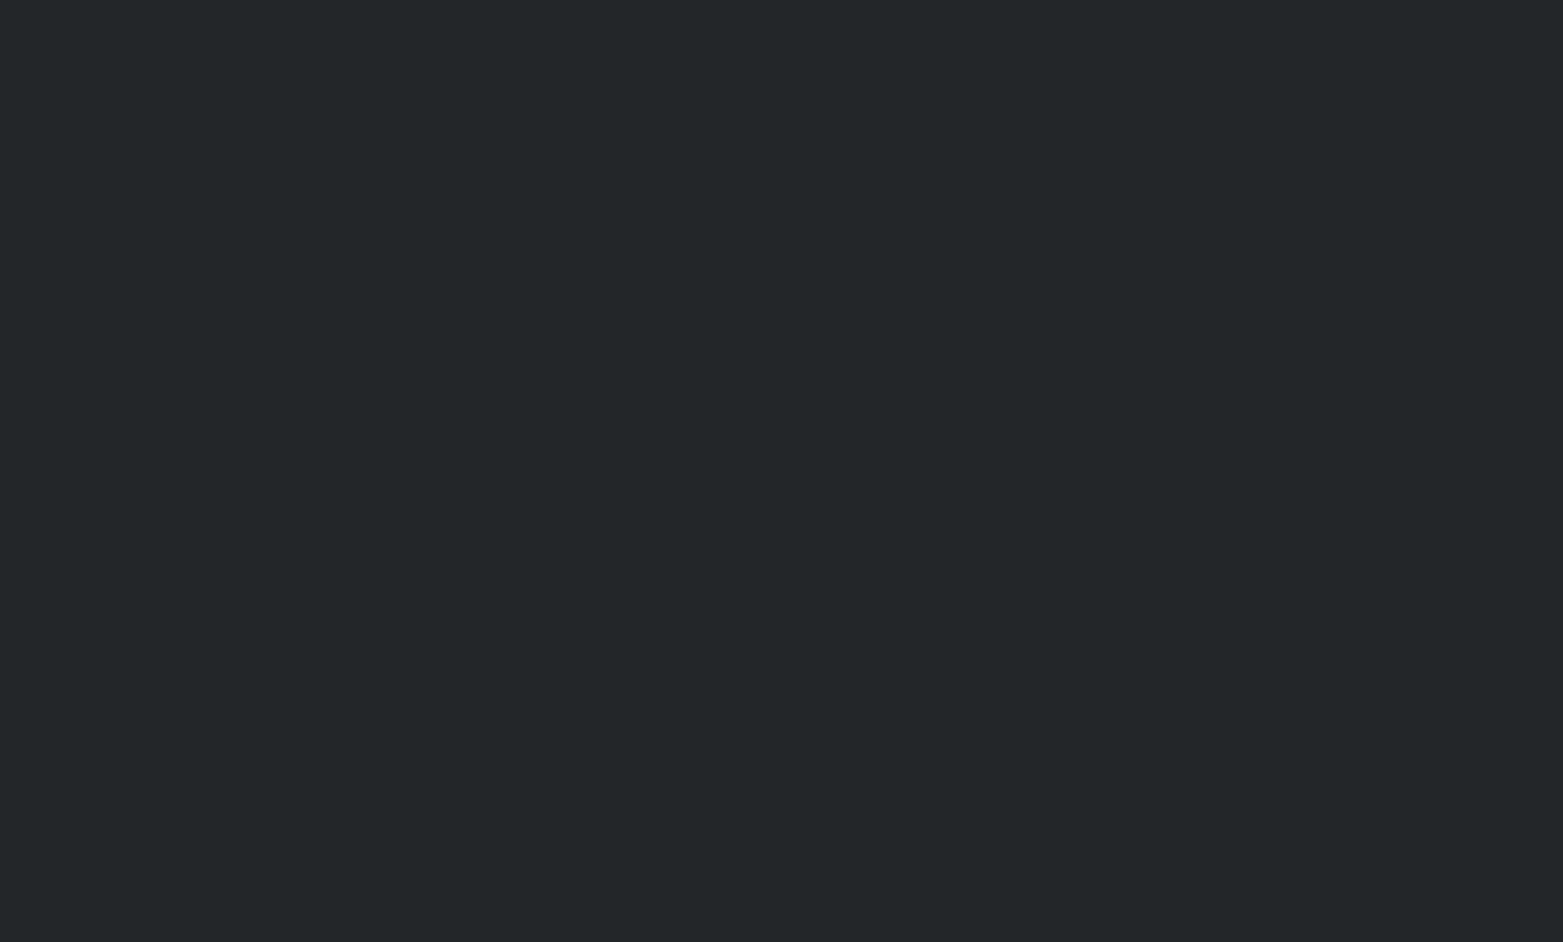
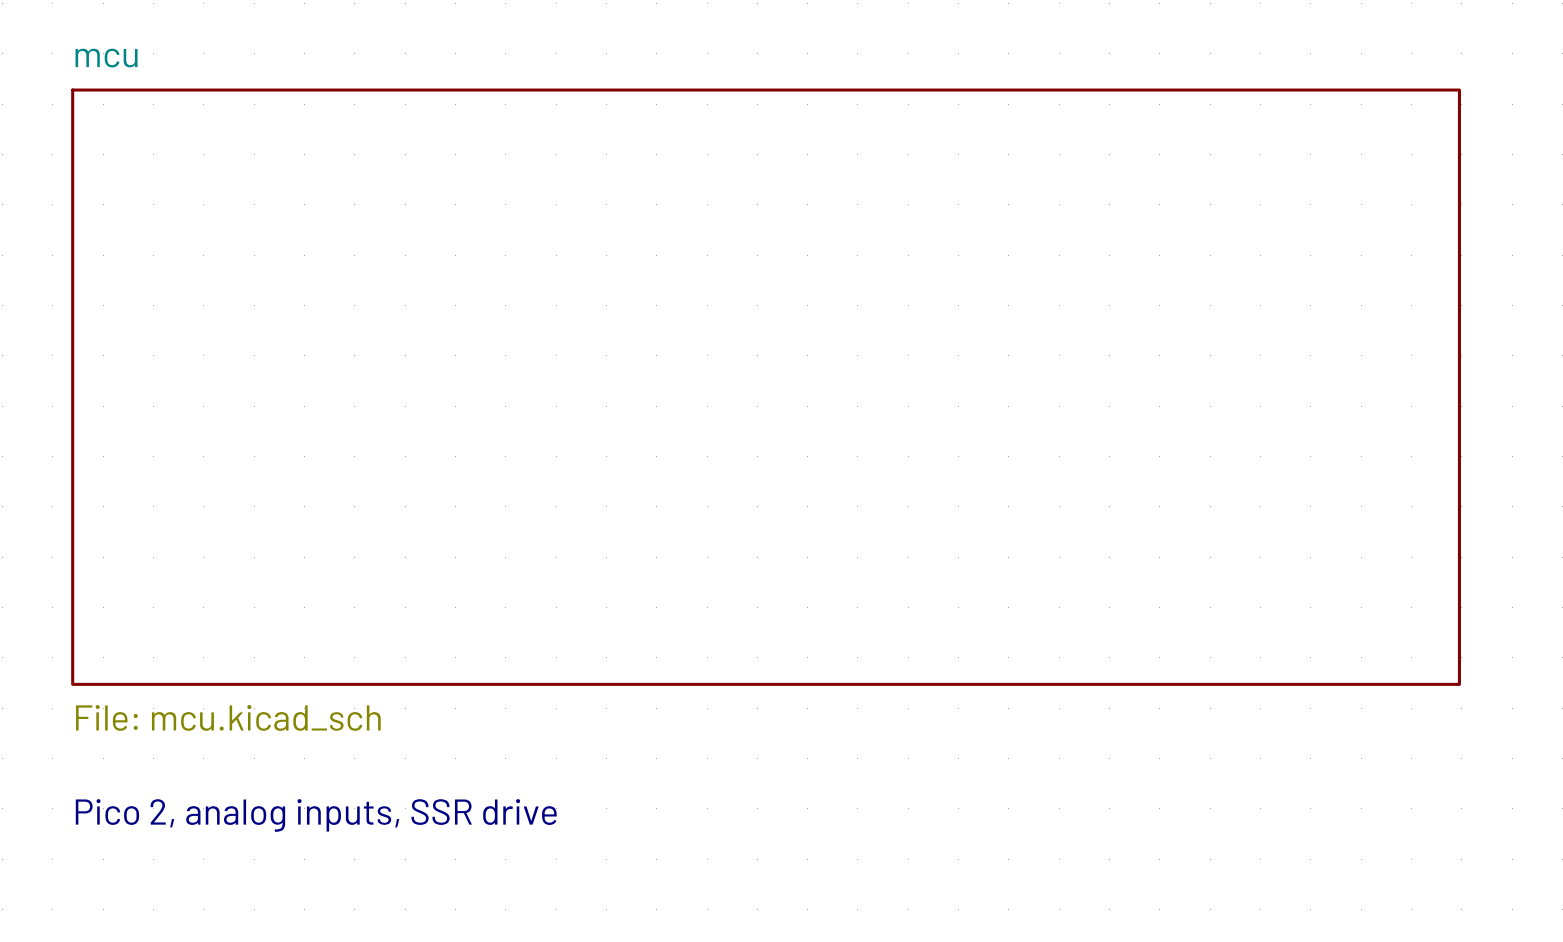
sheet mcu: none -> File: mcu.kicad_sch (766, 387)
text: none -> Pico 2, analog inputs, SSR drive (316, 815)

